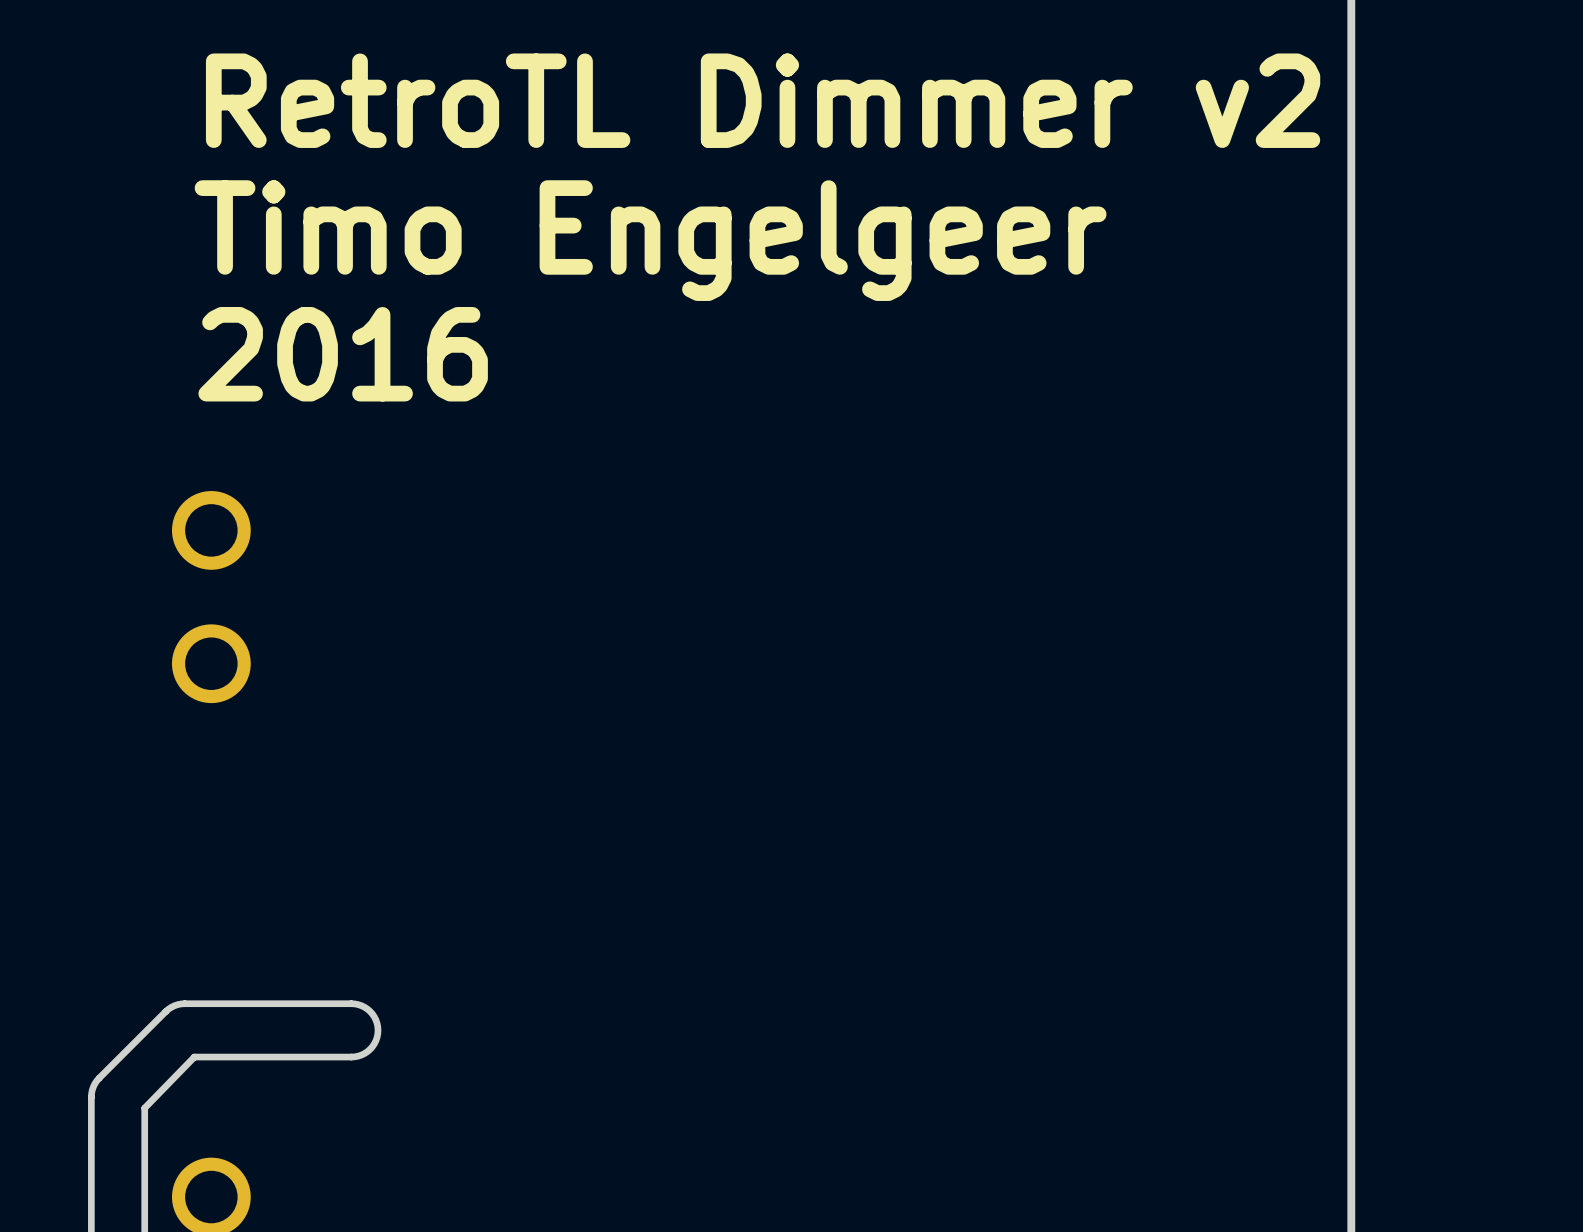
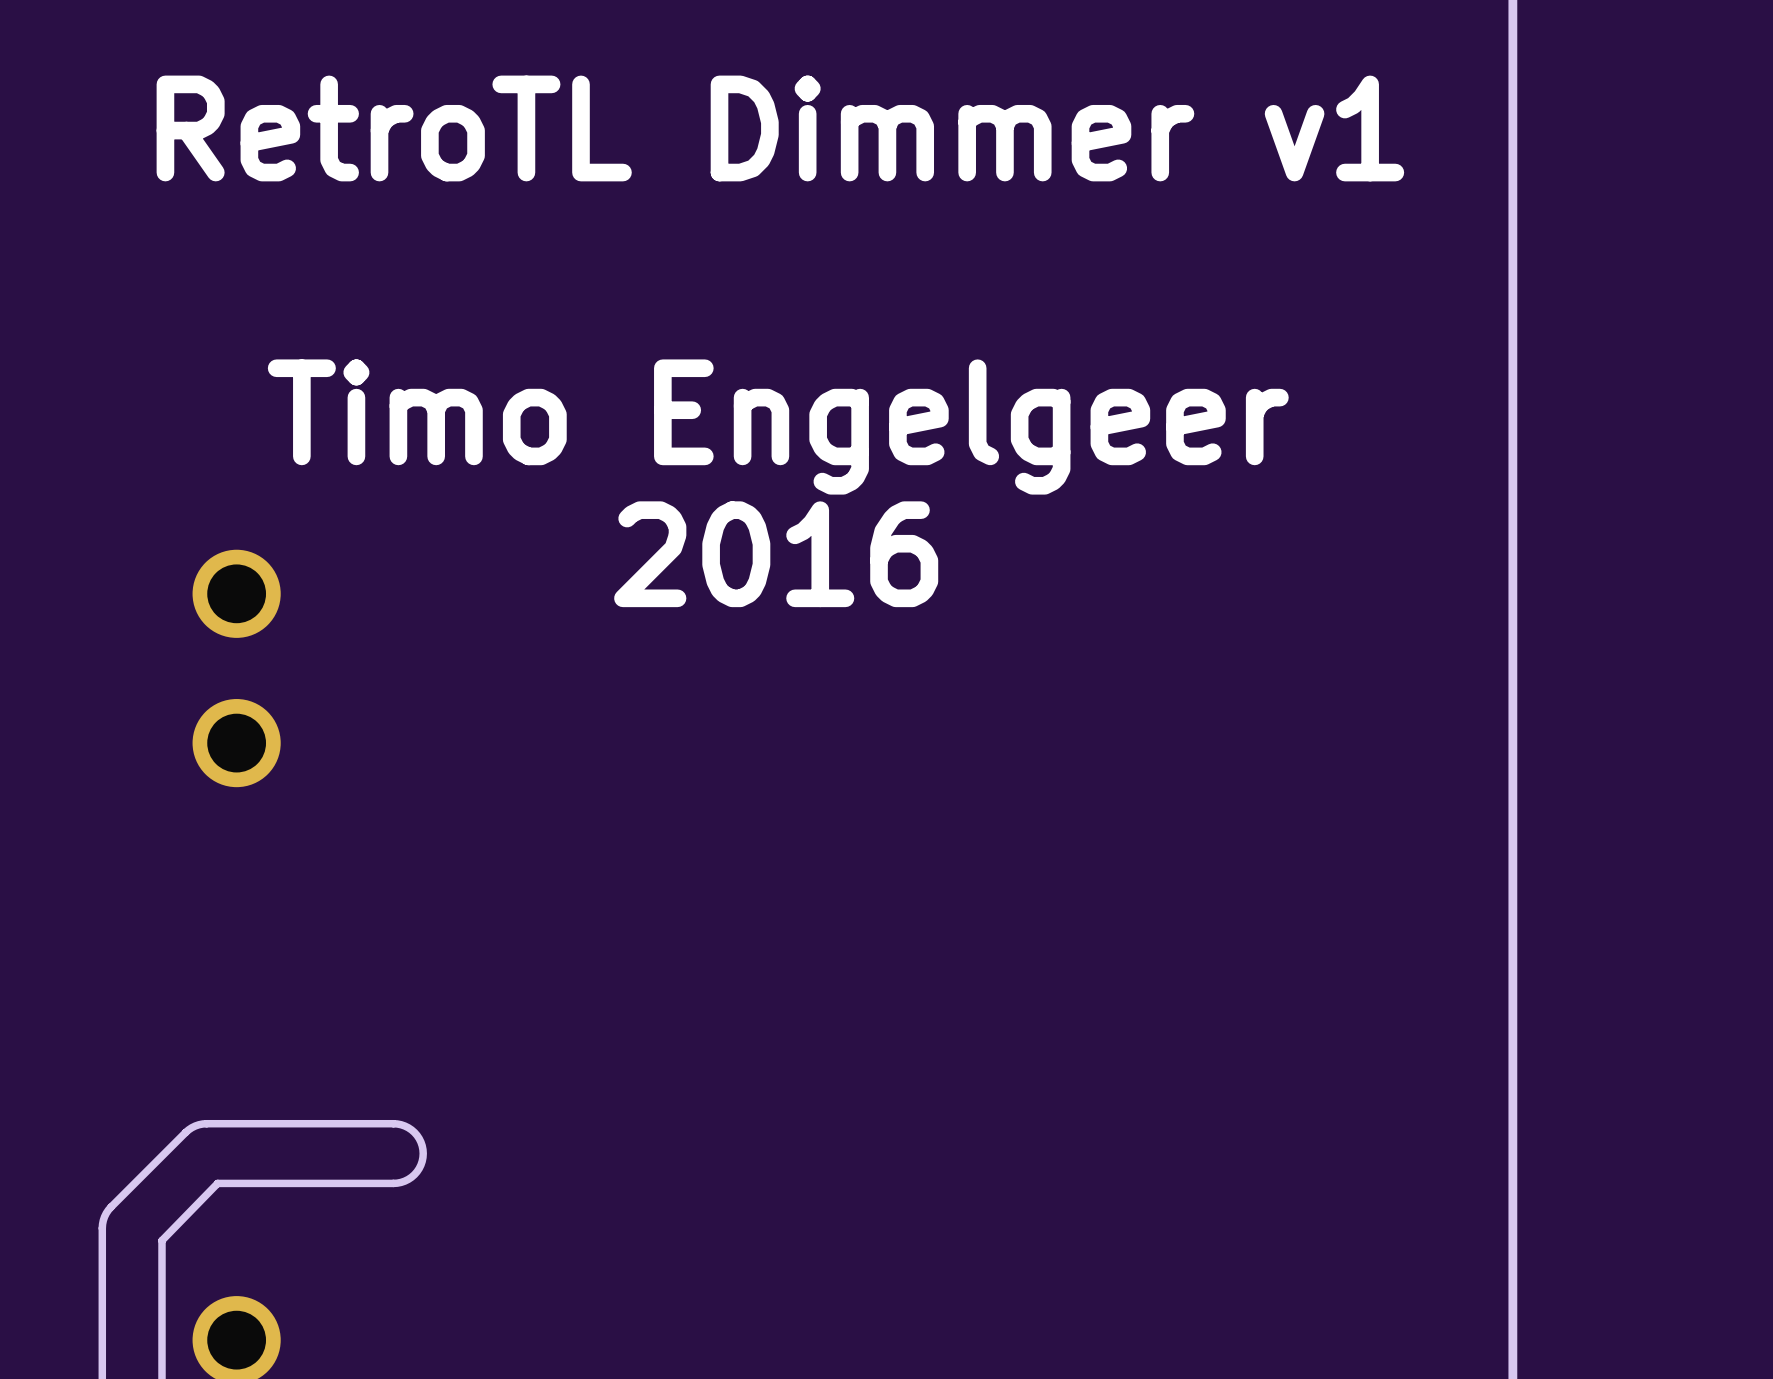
text: RetroTL Dimmer v2 (763, 100) -> RetroTL Dimmer v1 (780, 128)
text position: Timo Engelgeer (650, 240) -> Timo Engelgeer (778, 427)
text position: 2016 (343, 354) -> 2016 (776, 554)

